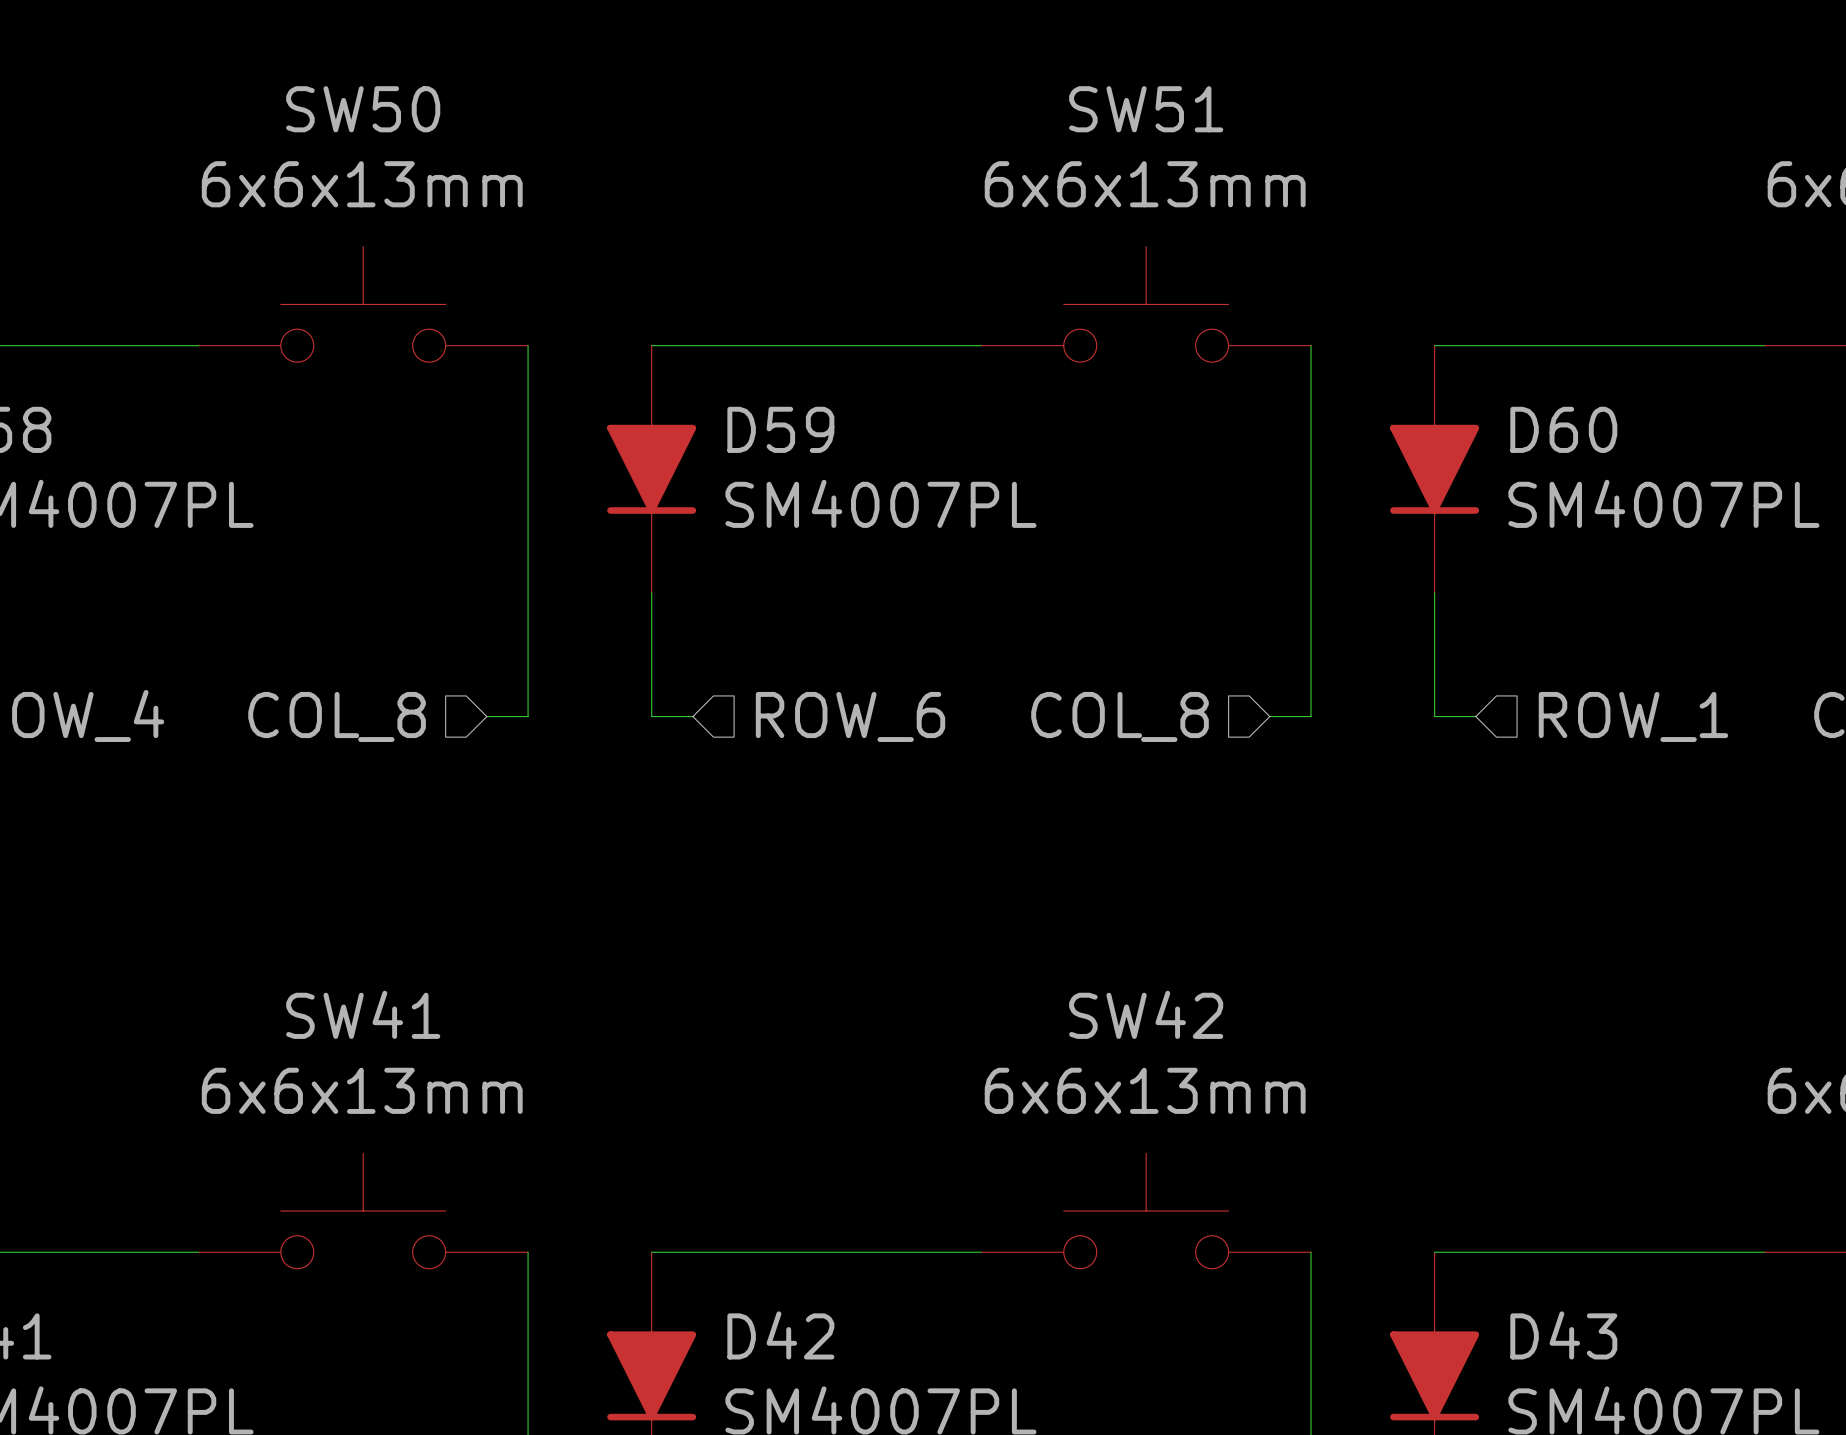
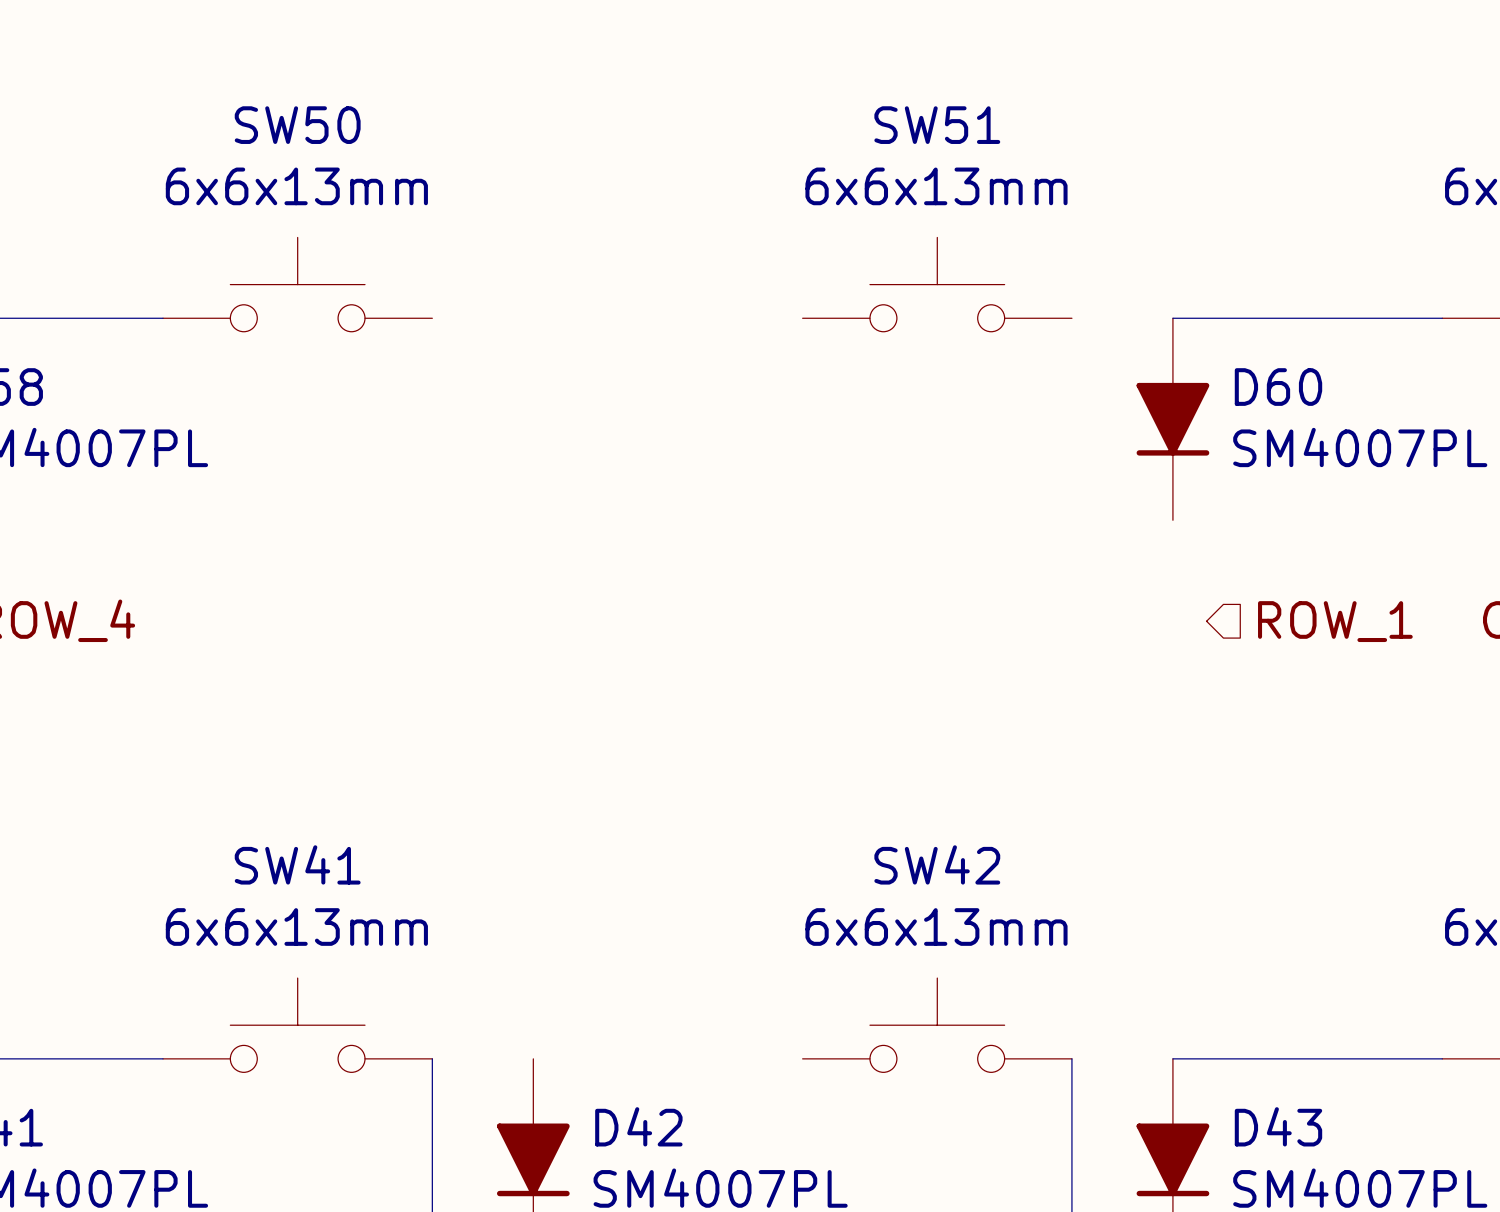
wire: (528, 345) (528, 716) (486, 716) -> none
wire: (651, 345) (981, 345) -> none
wire: (1311, 345) (1311, 716) (1269, 716) -> none
D59: SM4007PL (651, 469) -> none
wire: (651, 592) (651, 716) (692, 716) -> none
wire: (1434, 592) (1434, 716) (1475, 716) -> none
hierarchical label: COL_8 (337, 716) -> none
hierarchical label: ROW_6 (850, 716) -> none
hierarchical label: COL_8 (1120, 716) -> none
wire: (651, 1252) (981, 1252) -> none

